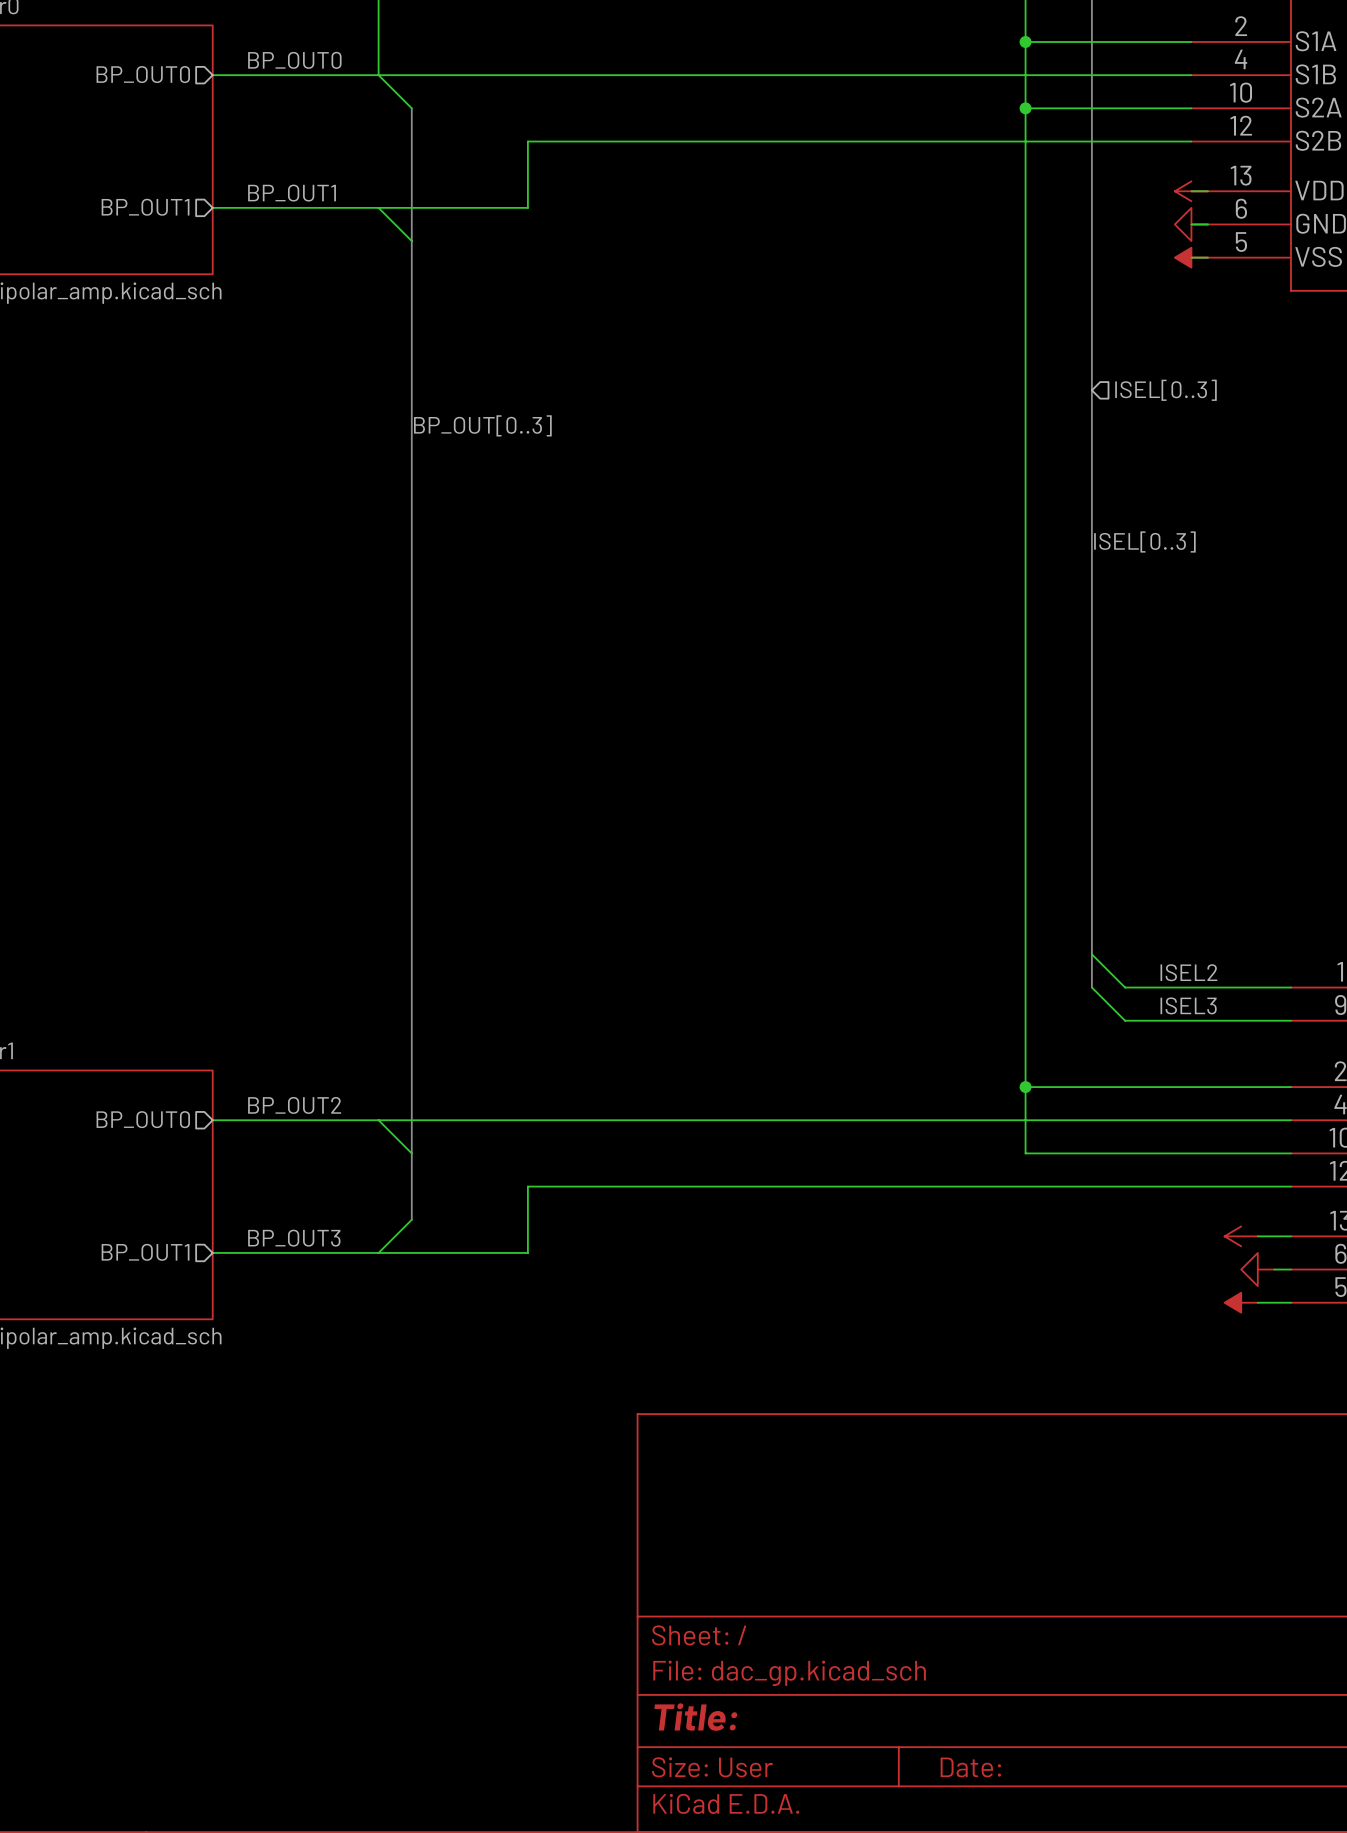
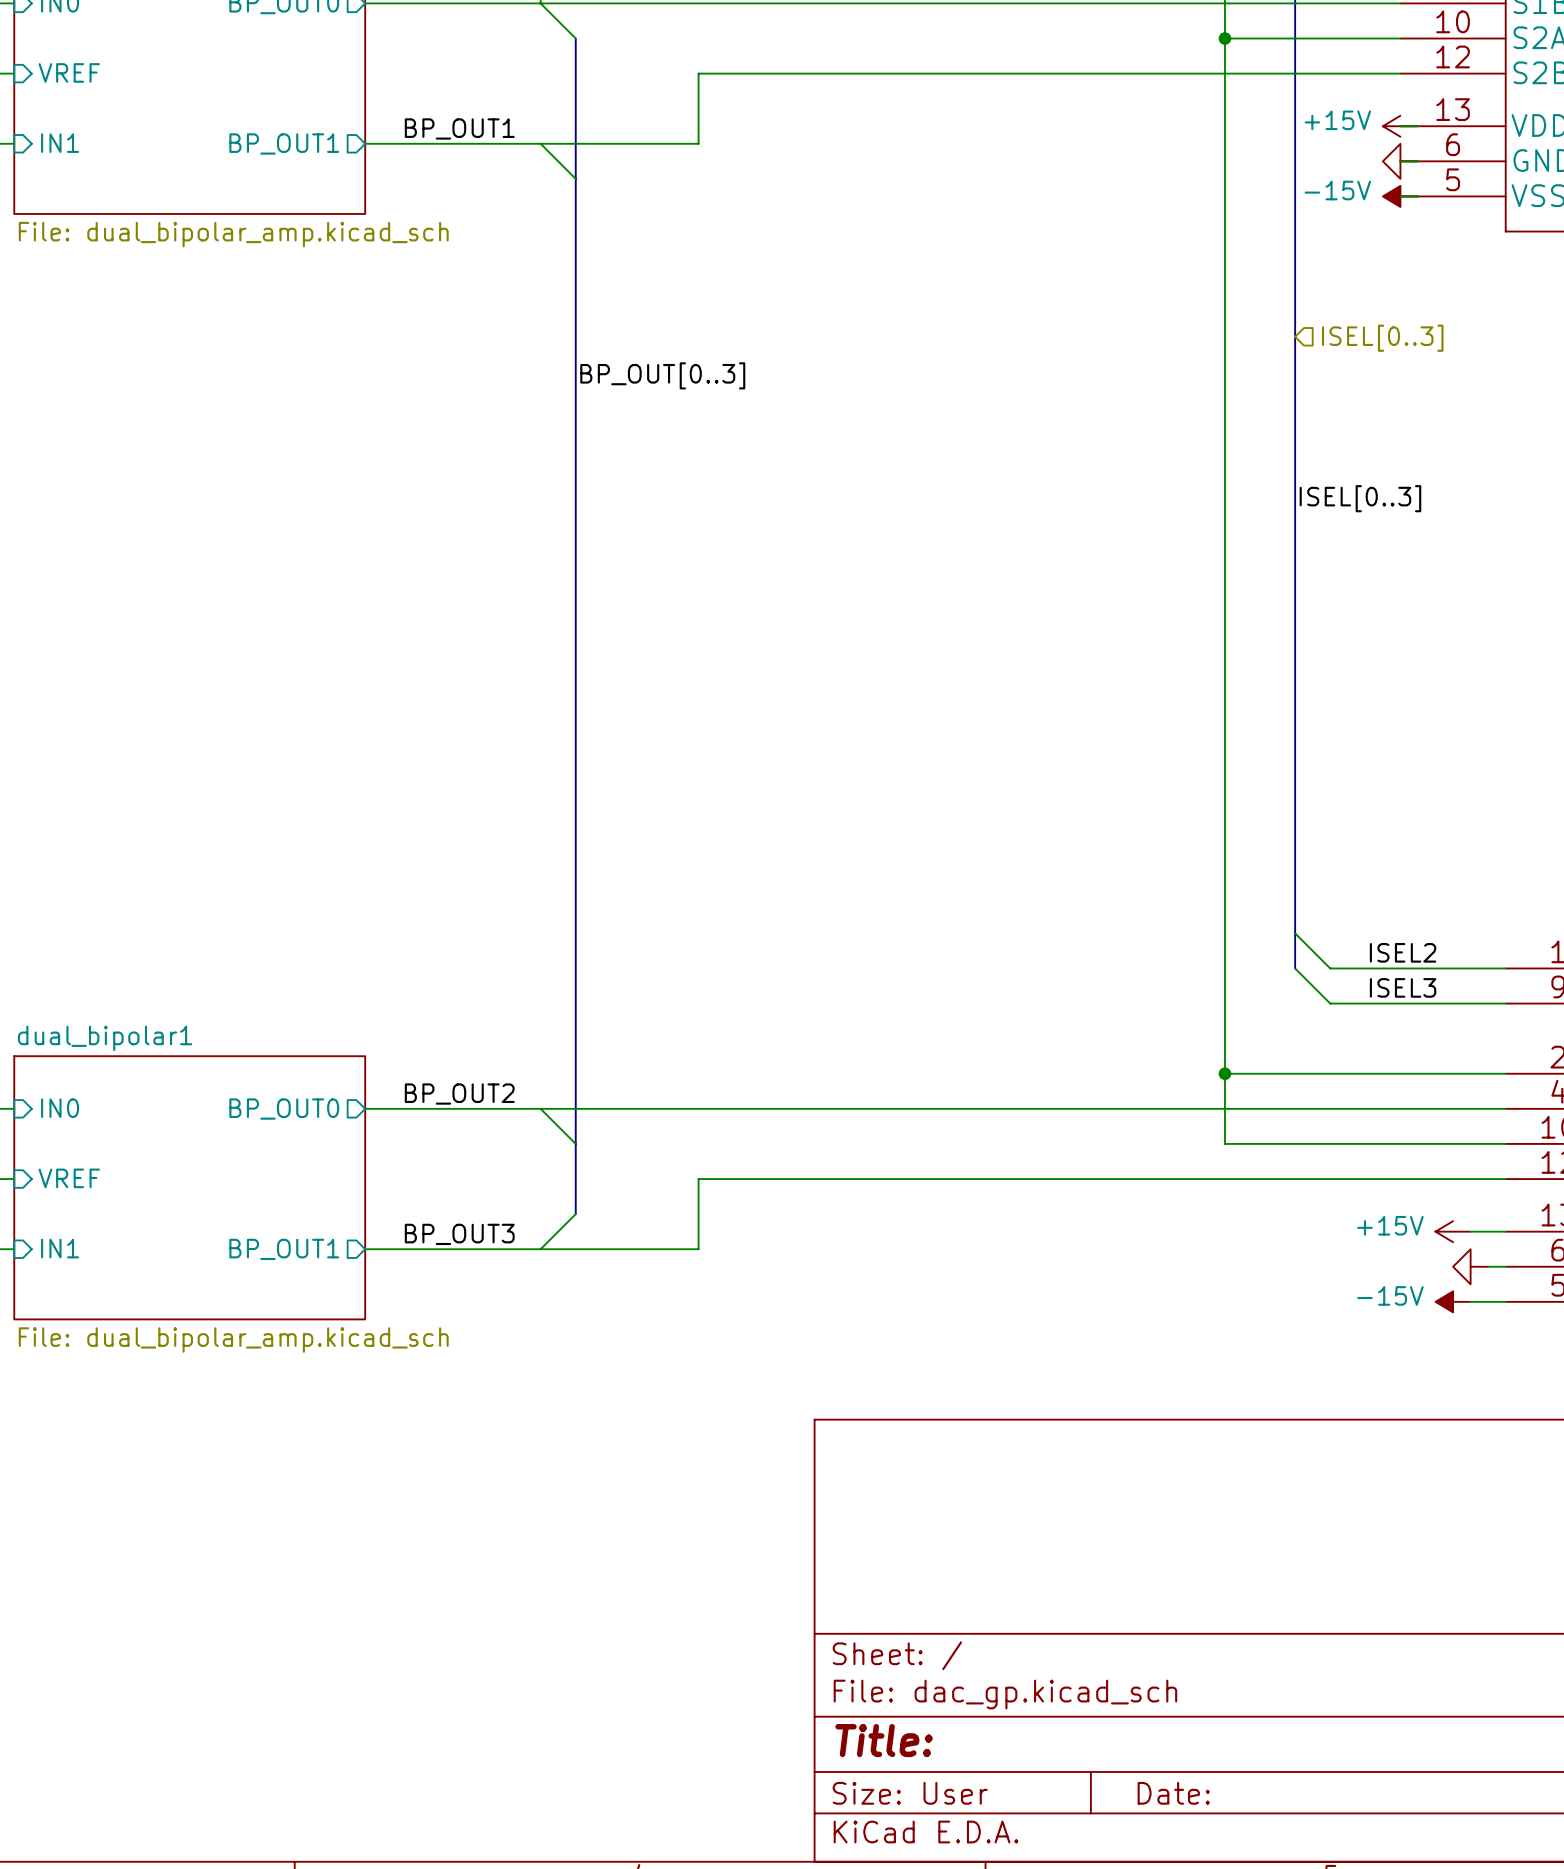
power symbol text: none -> +15V (1337, 120)
power symbol text: none -> -15V (1337, 190)
power symbol text: none -> +15V (1390, 1225)
power symbol text: none -> -15V (1390, 1295)

